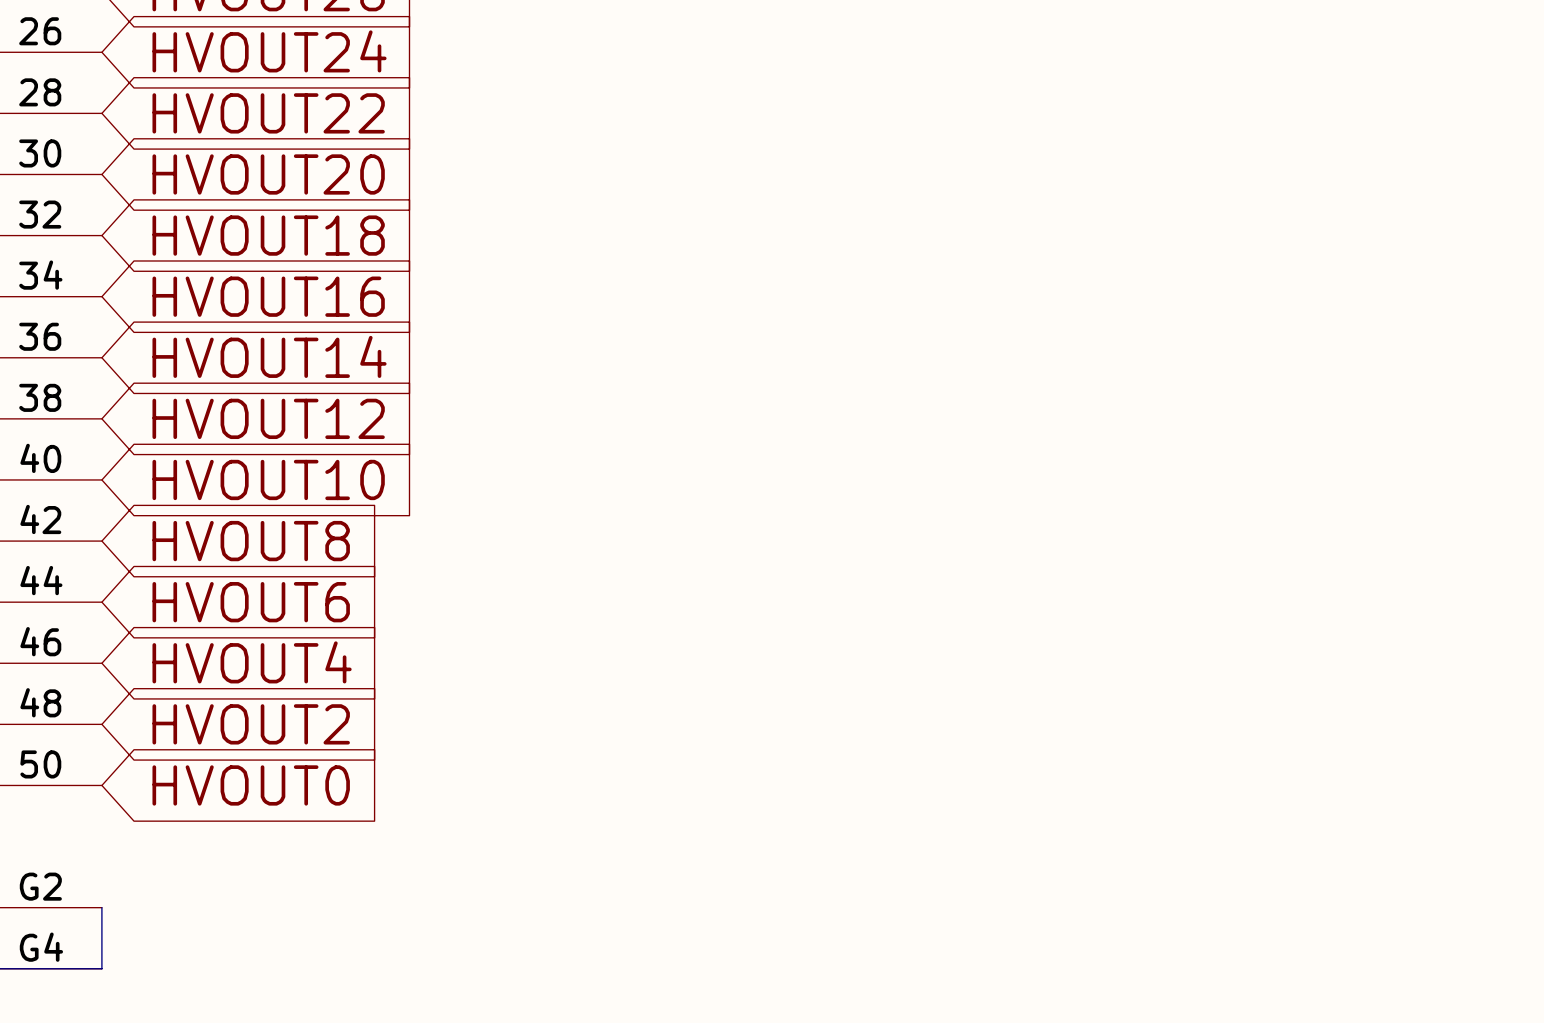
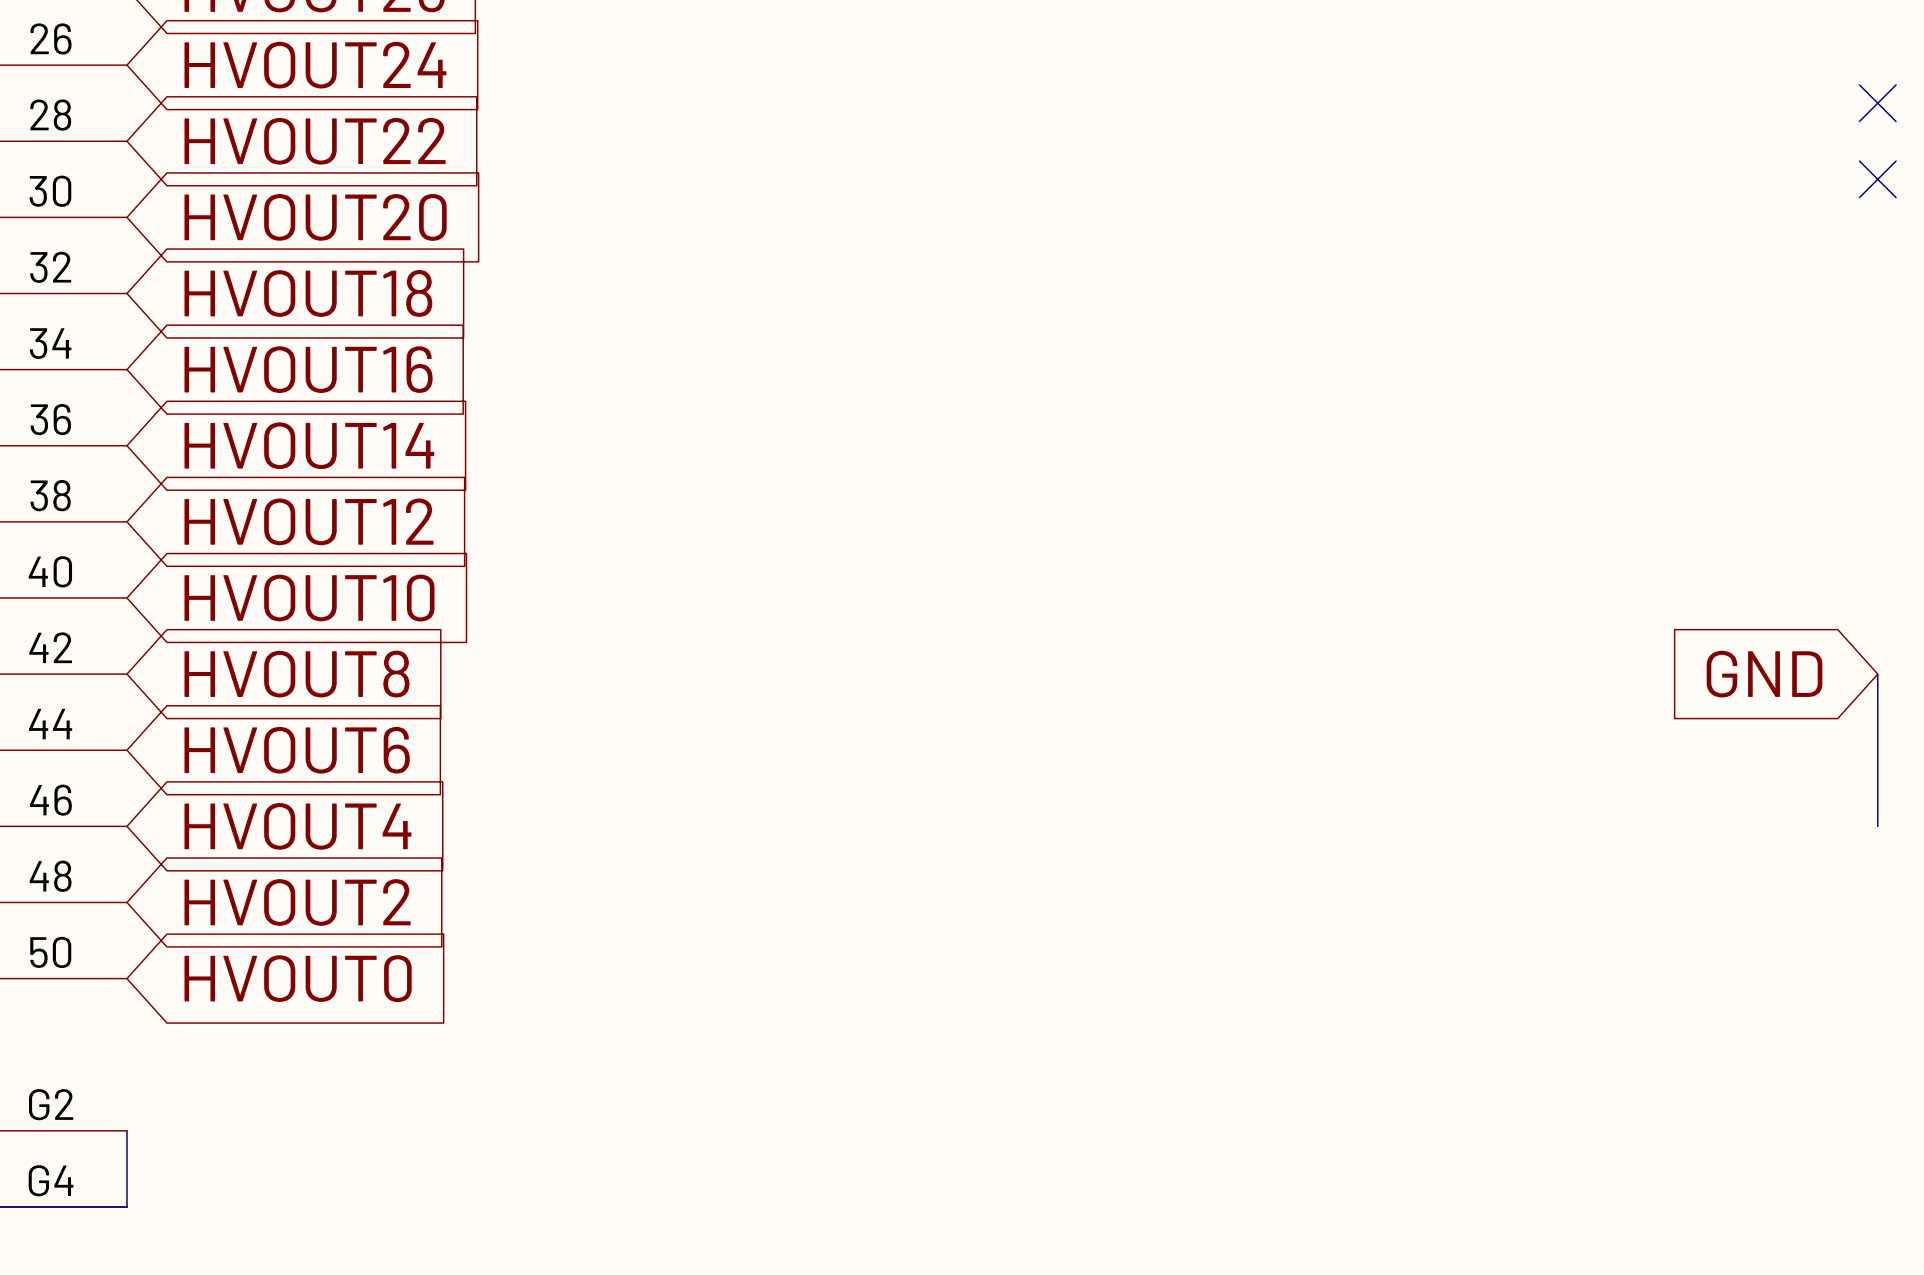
no-connect mark: none -> (1877, 103)
no-connect mark: none -> (1877, 179)
global label: none -> GND (1764, 674)
wire: none -> (1877, 674) (1877, 826)

